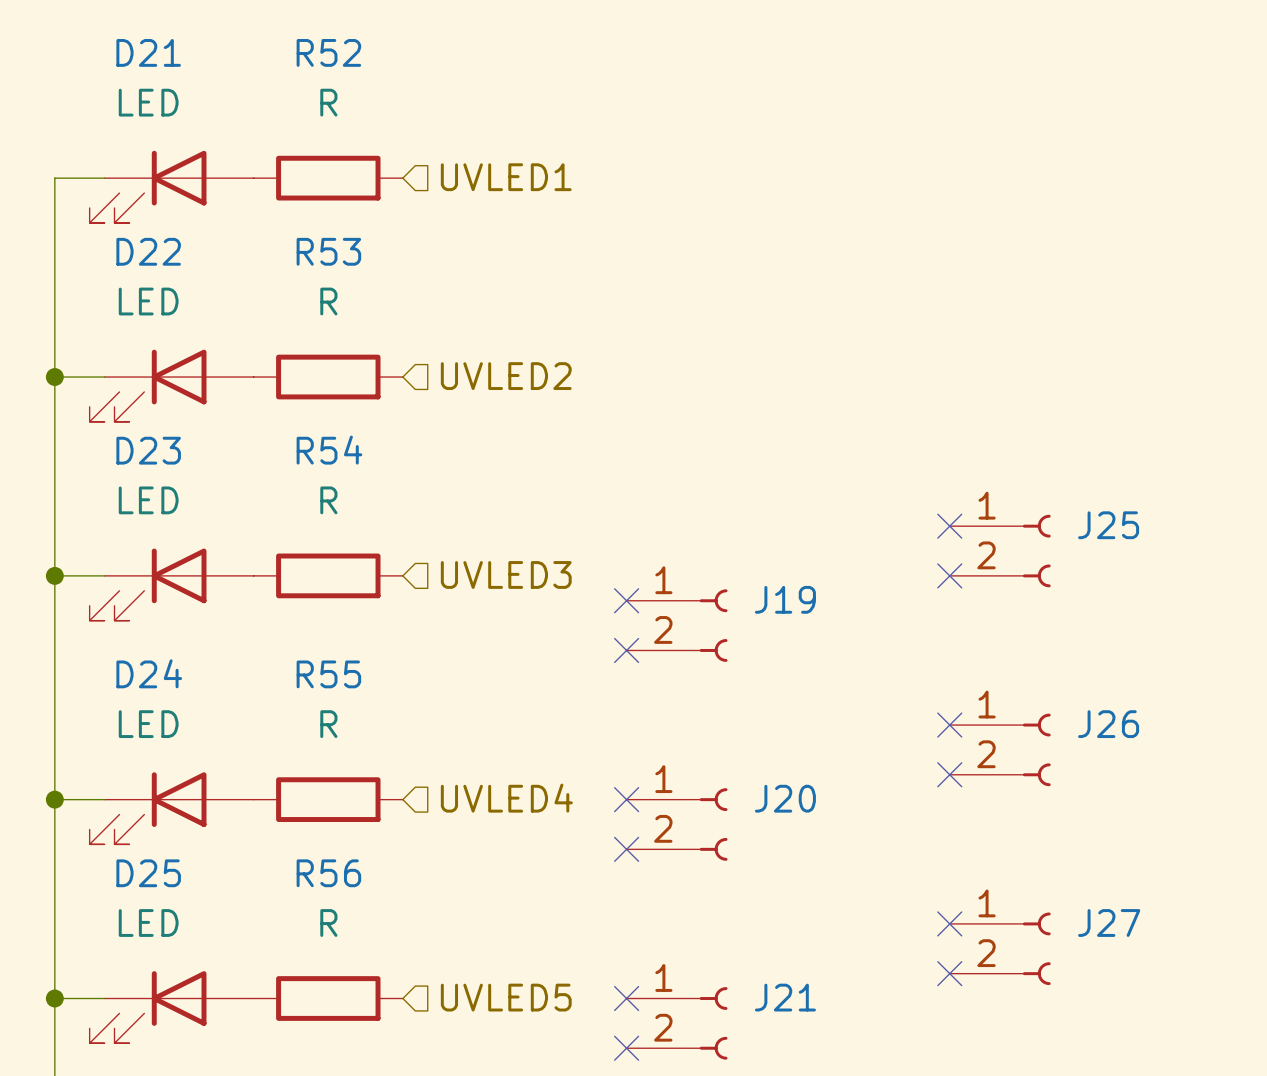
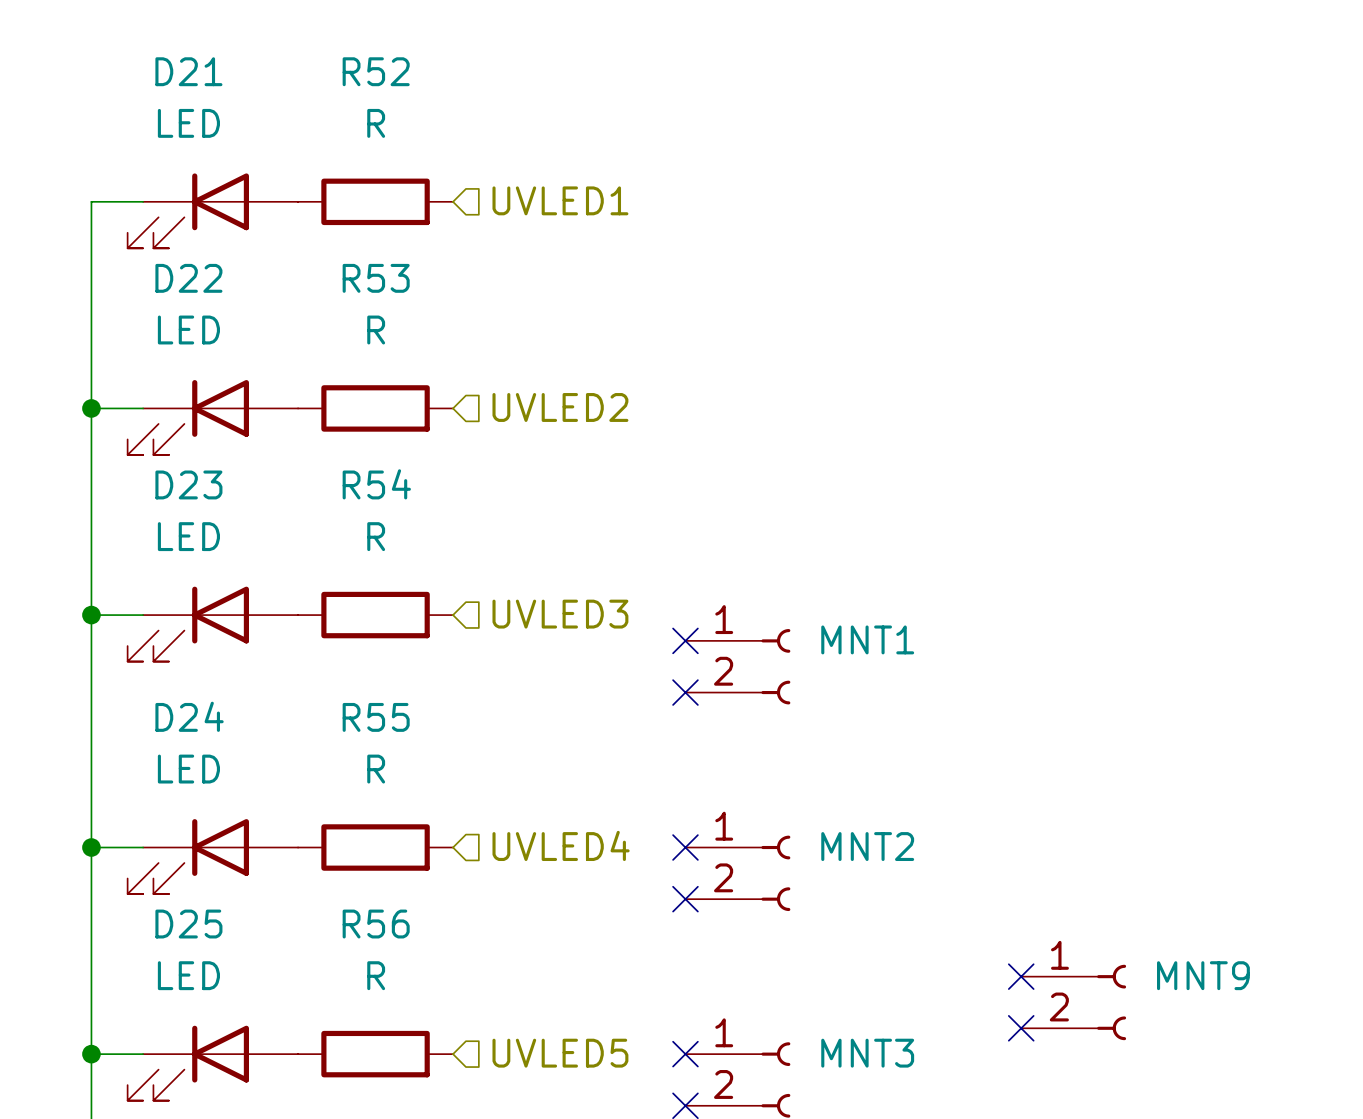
no-connect mark: (949, 526) -> none
J25: (1000, 551) -> none
no-connect mark: (949, 575) -> none
J19 name: J19 (785, 599) -> MNT1 (867, 639)
no-connect mark: (949, 725) -> none
J26: (1000, 749) -> none
no-connect mark: (949, 774) -> none
J20 name: J20 (785, 798) -> MNT2 (867, 846)
J27 name: J27 (1109, 923) -> MNT9 (1203, 975)
J21 name: J21 (785, 997) -> MNT3 (867, 1053)

